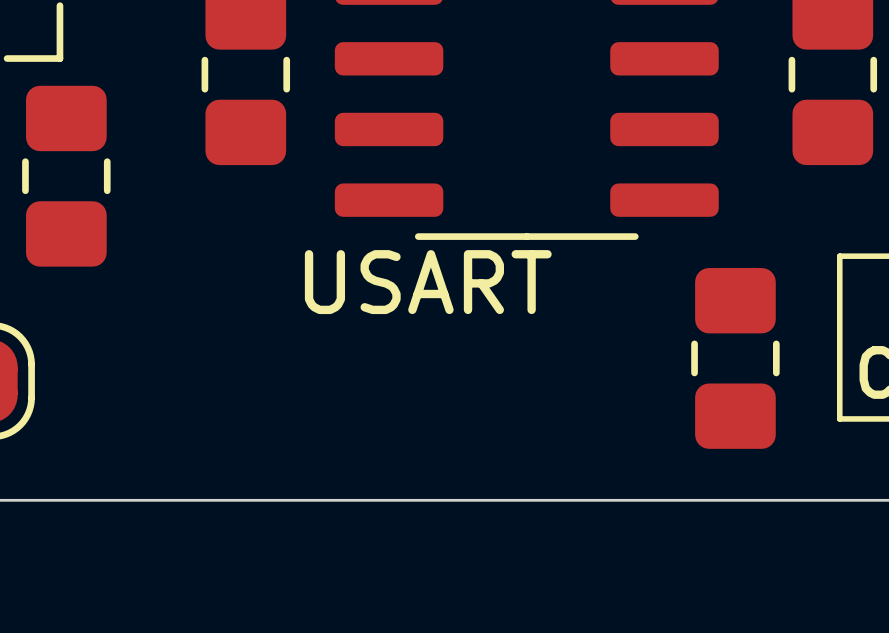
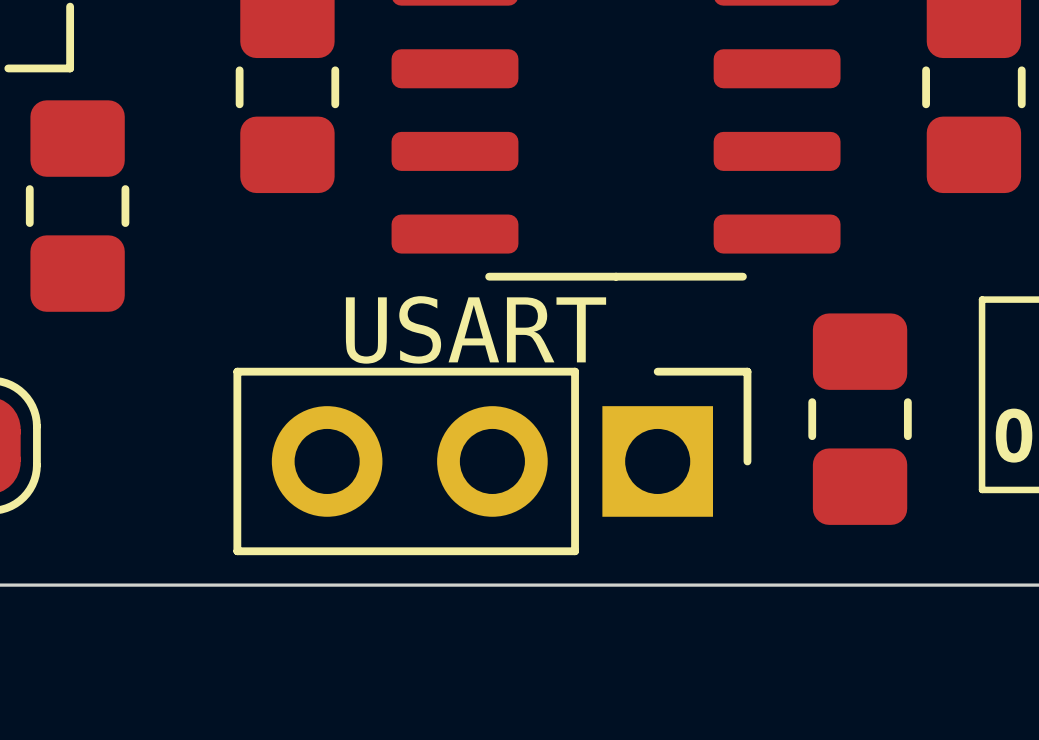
part: none -> (492, 461)

